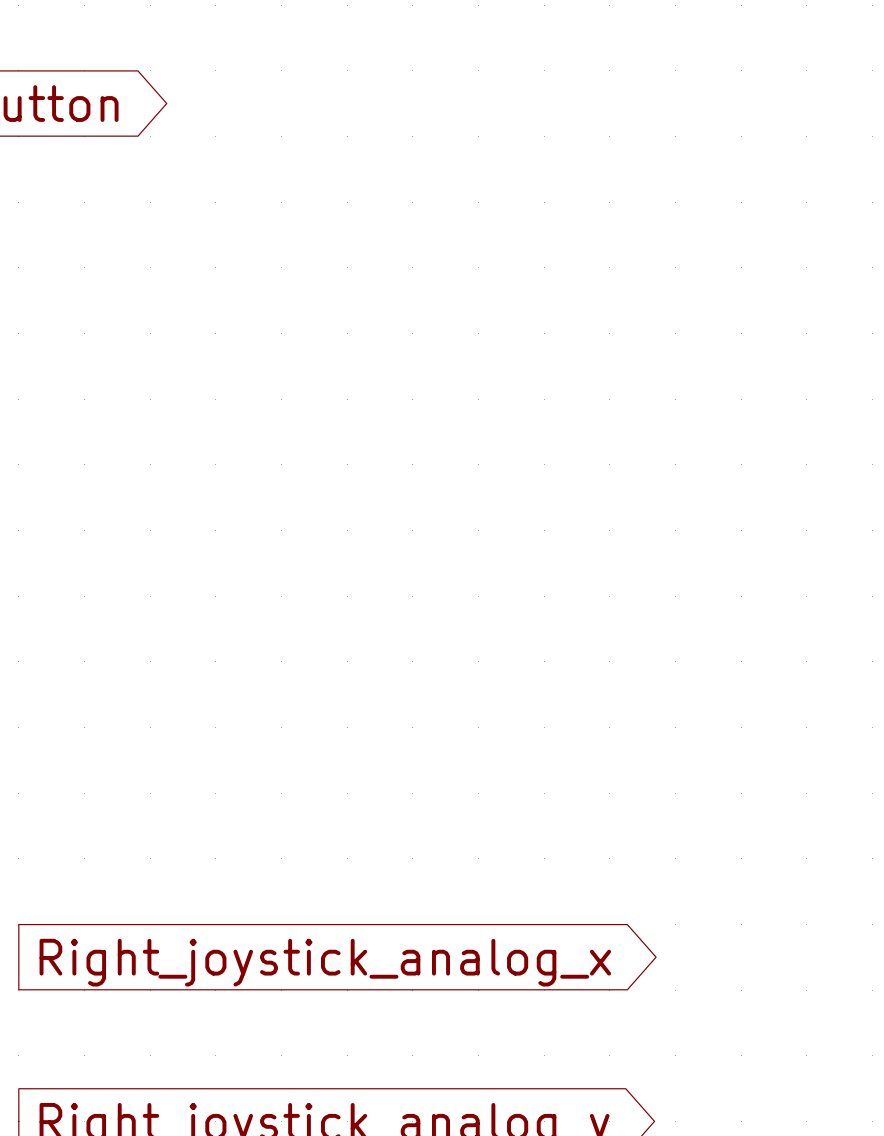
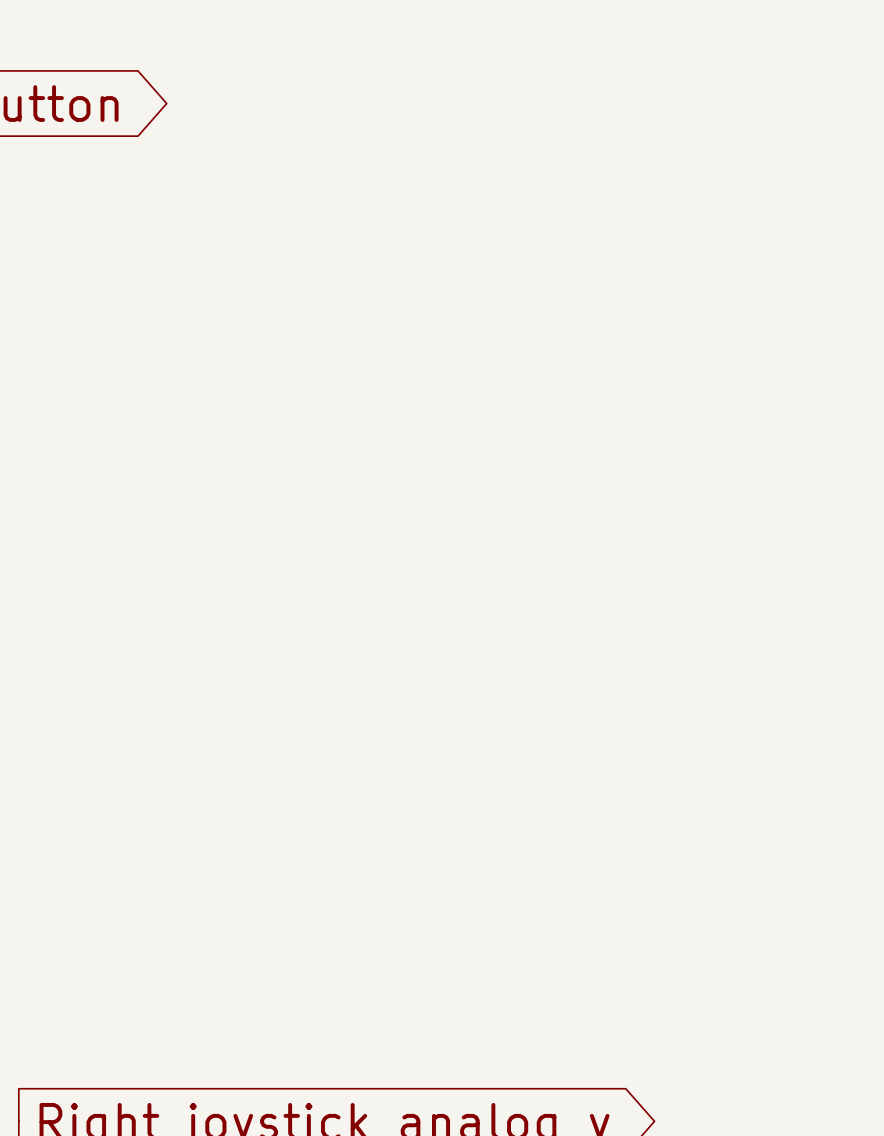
global label: Right_joystick_analog_x (325, 962) -> none

